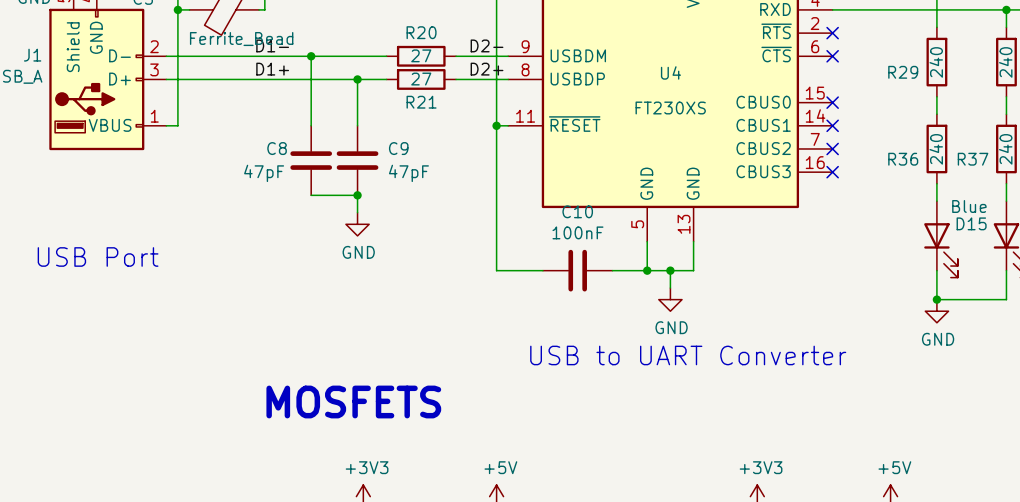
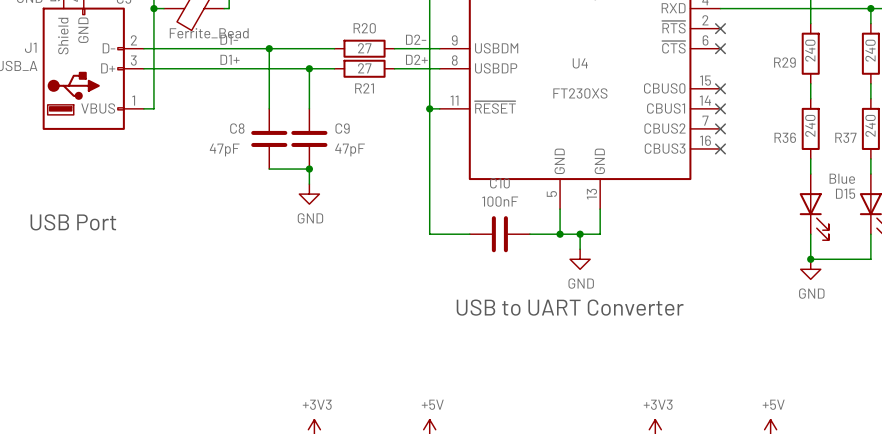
text: MOSFETS (353, 402) -> none

